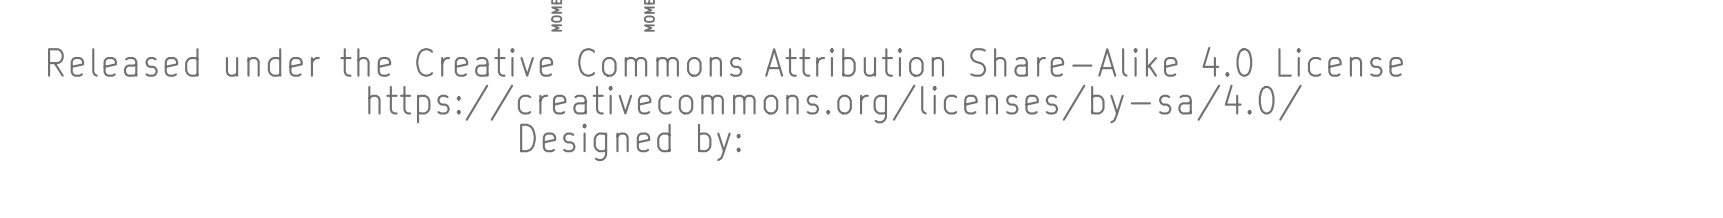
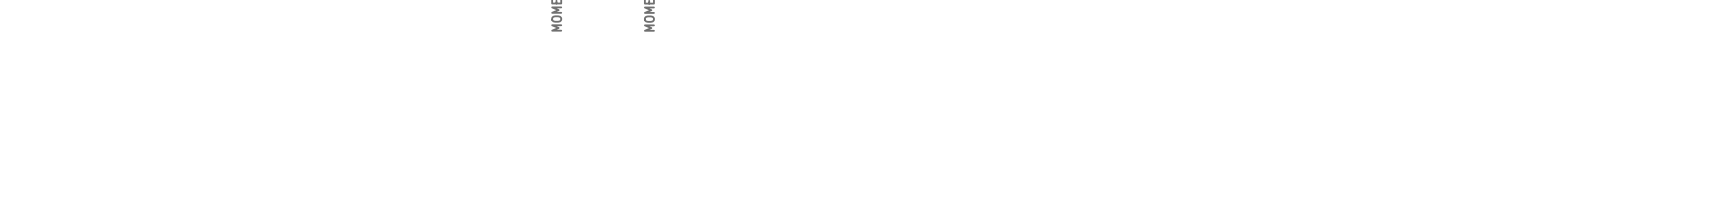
drawing: [48, 46, 1403, 162] -> none

